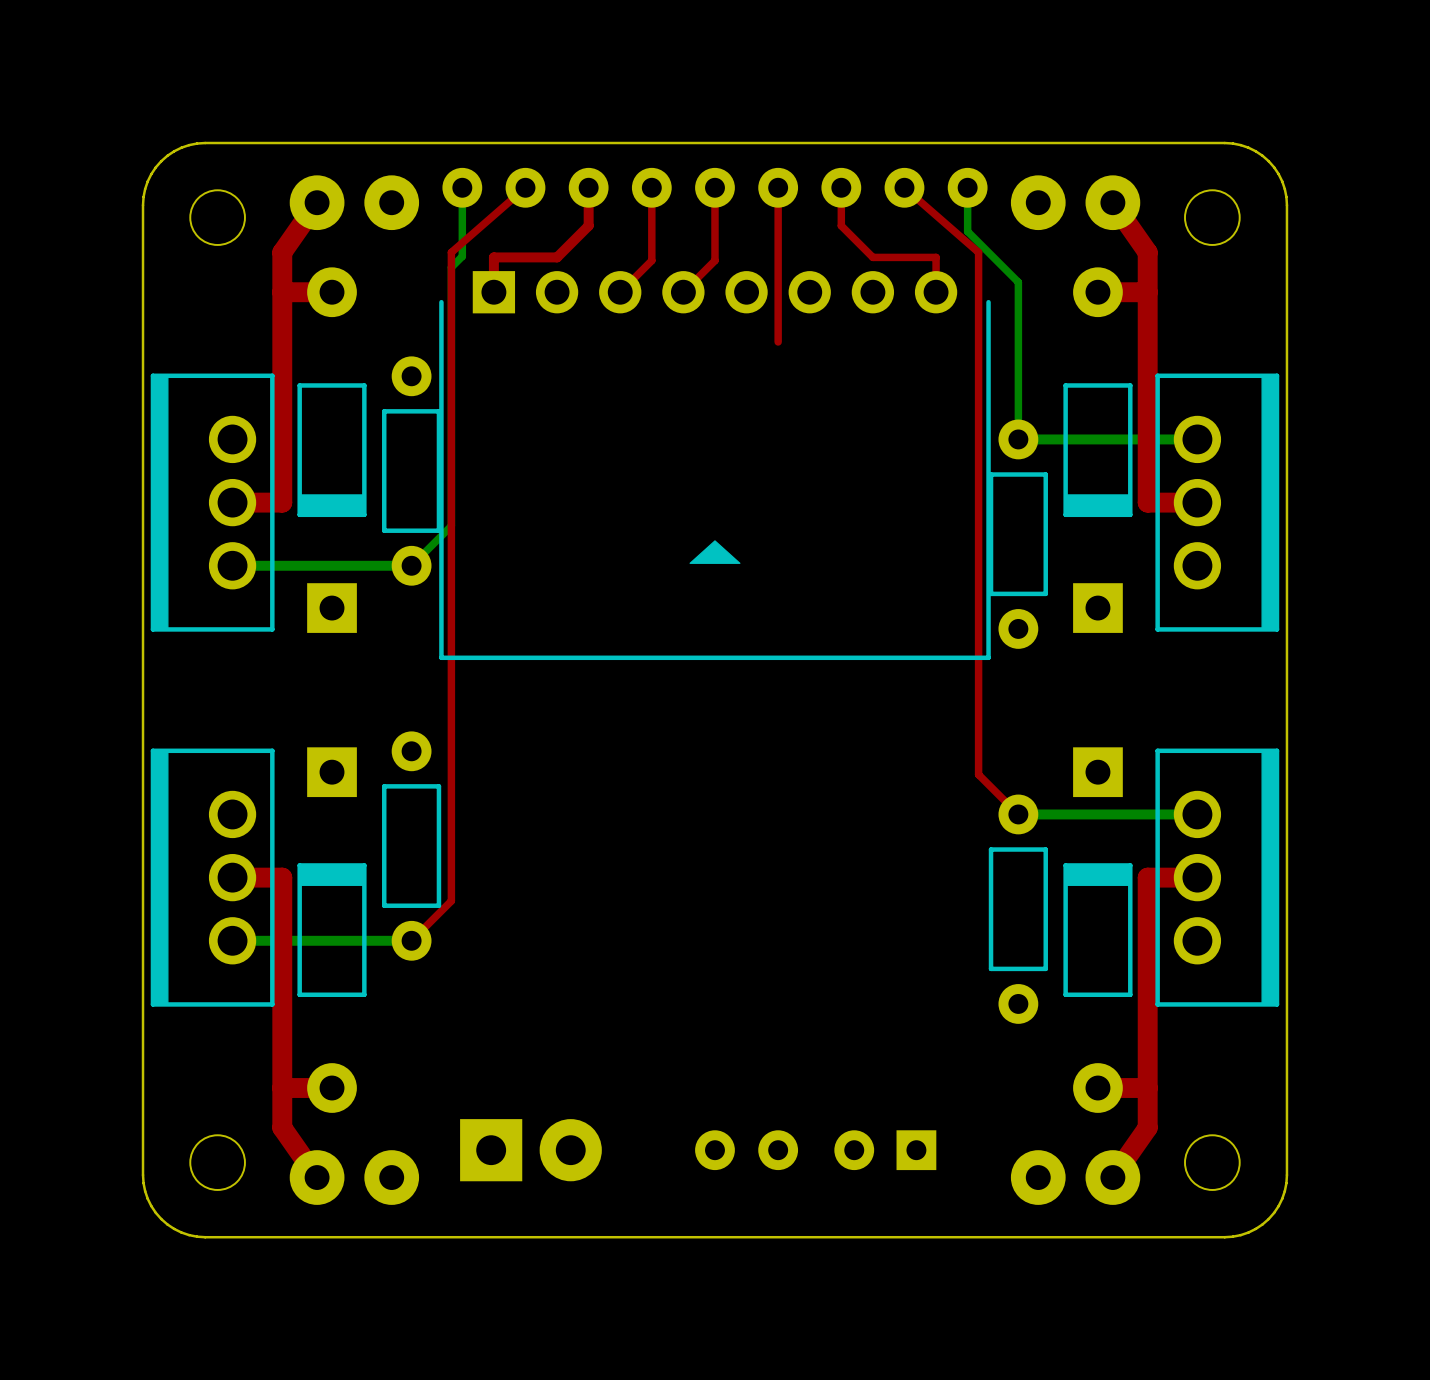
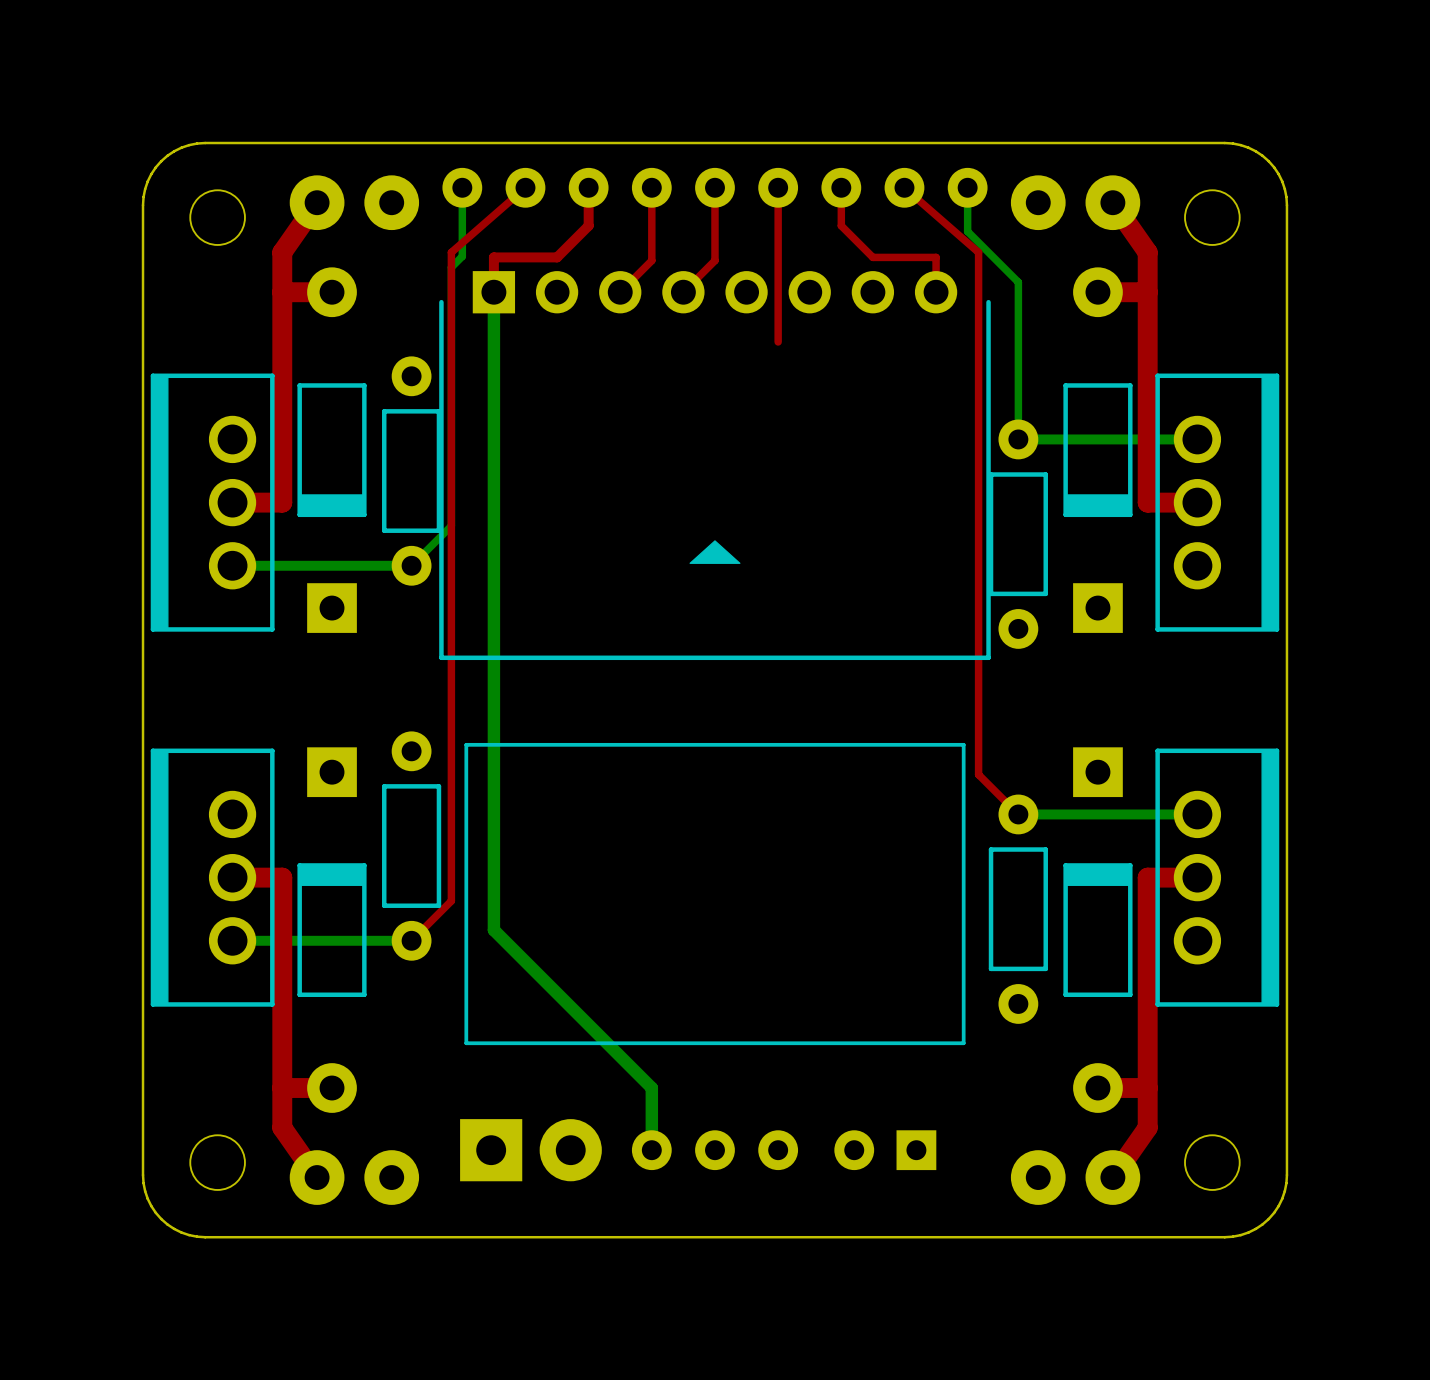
bottom track: none -> (493, 292) (493, 930) (651, 1088) (651, 1150)
line: none -> (466, 744) (963, 744) (963, 1043) (466, 1043) (466, 744)
part: none -> (651, 1150)

